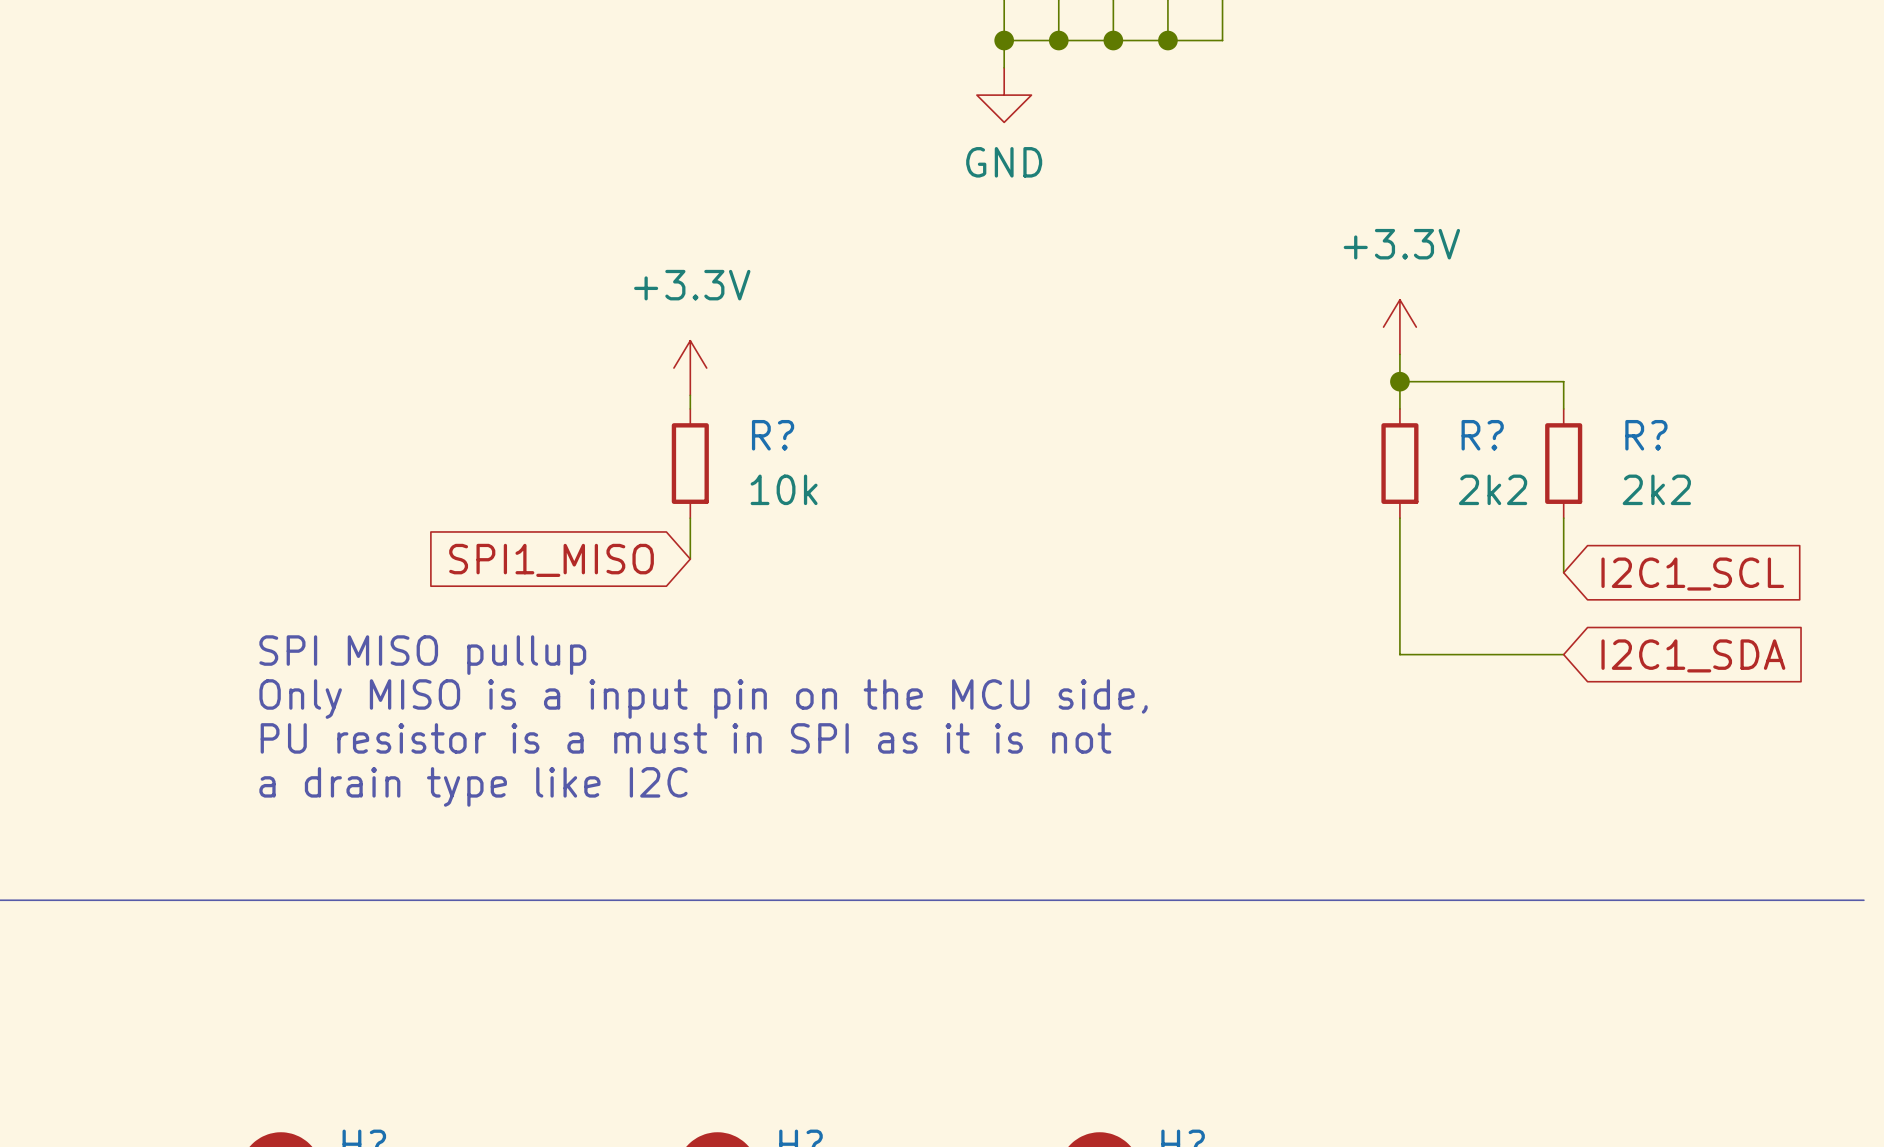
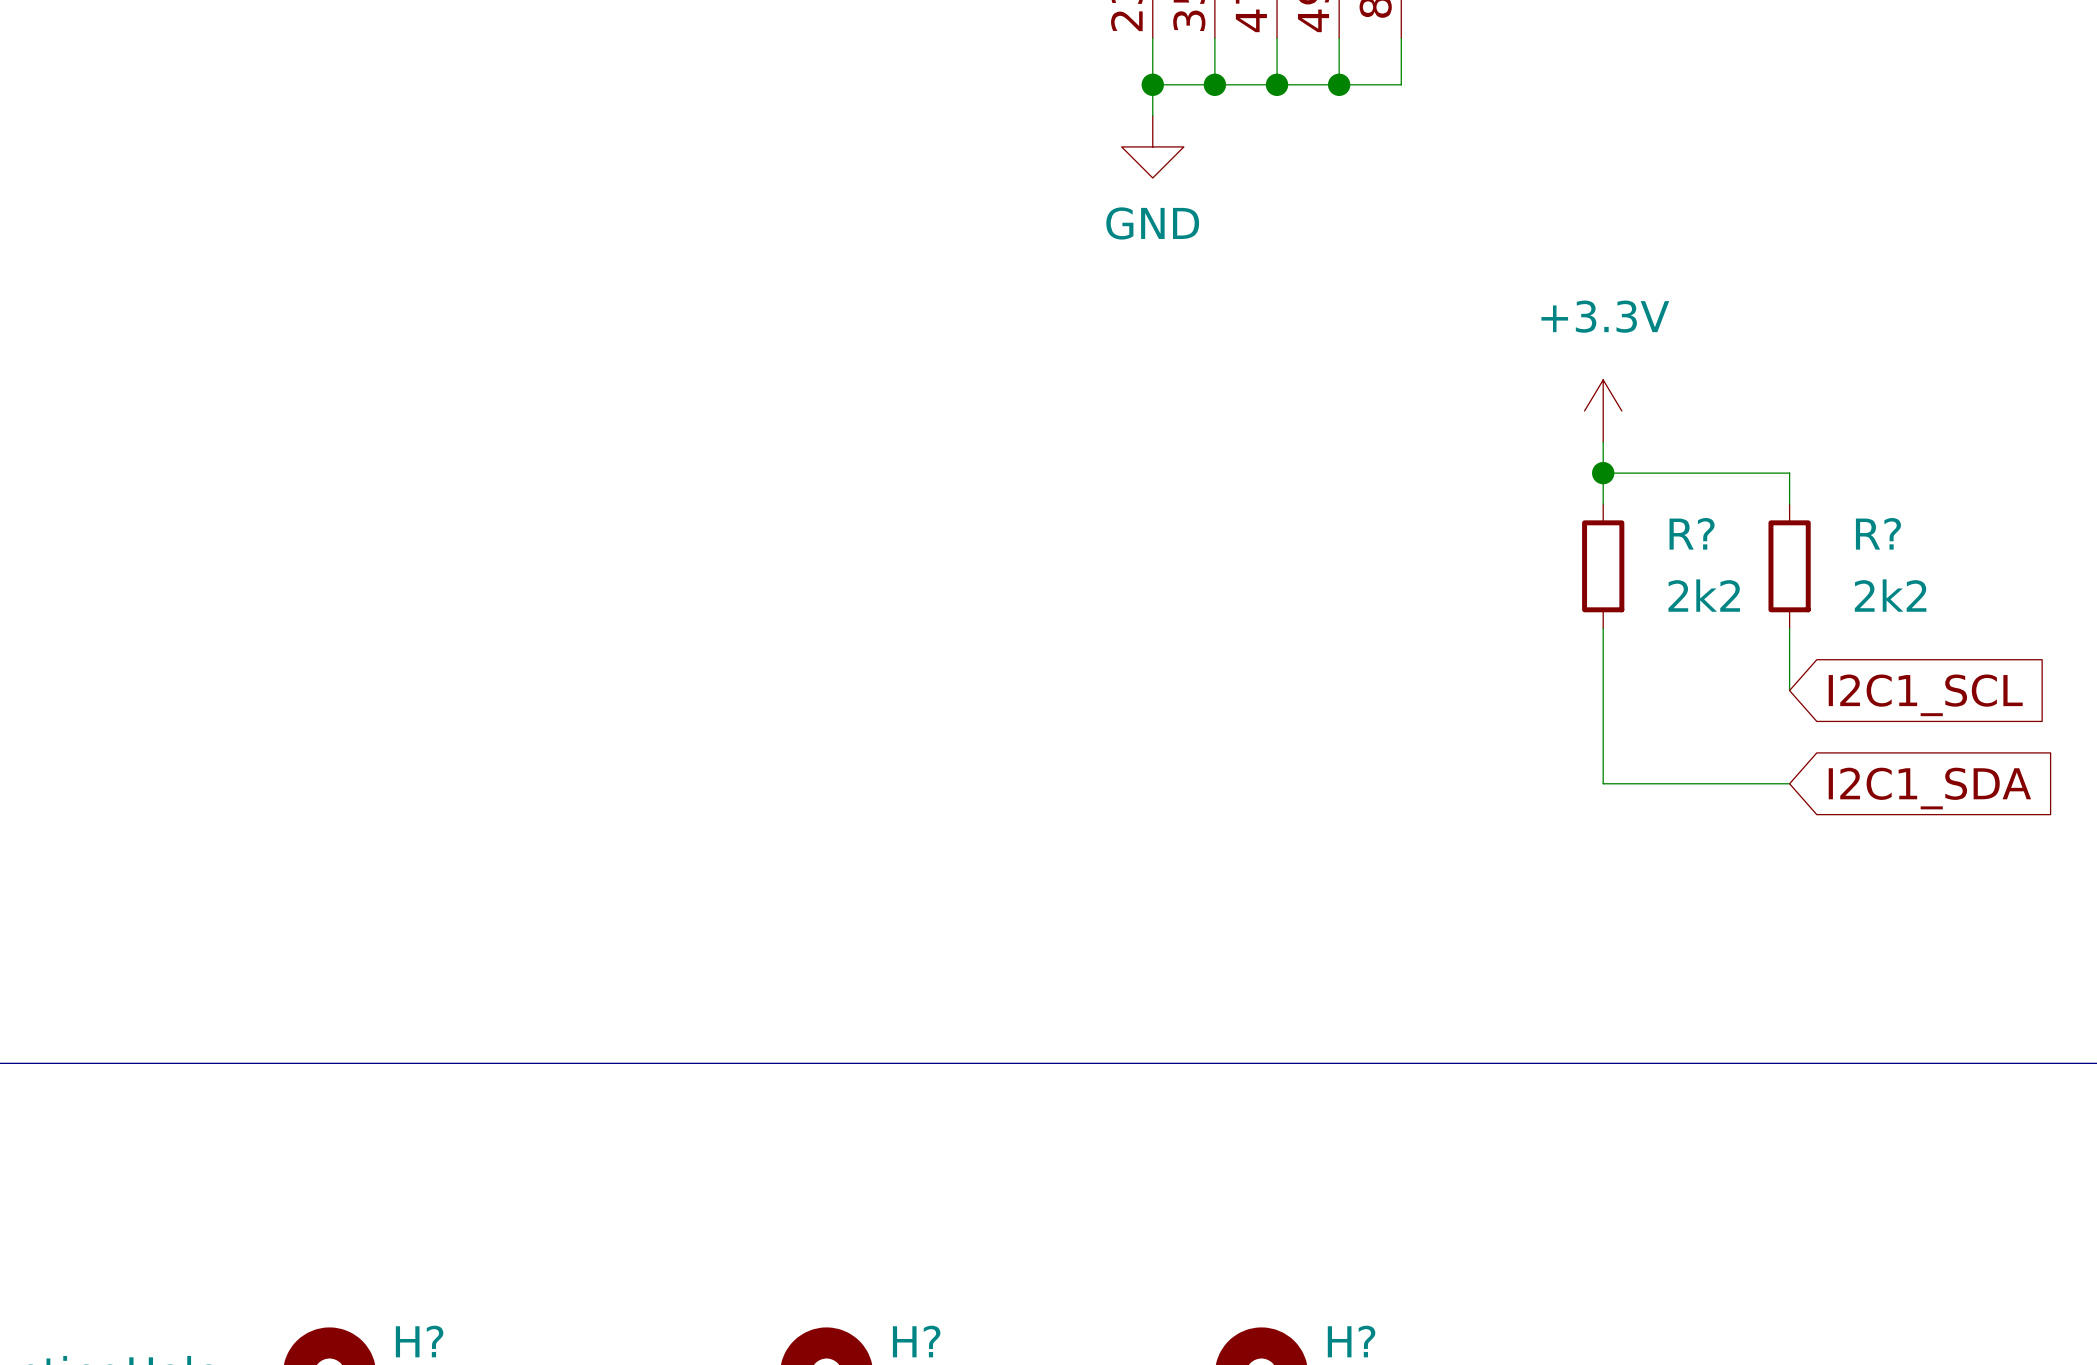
power symbol: +3.3V (690, 368) -> none
wire: (690, 395) (690, 408) -> none
R?: 10k (690, 463) -> none
wire: (690, 518) (690, 559) -> none
global label: SPI1_MISO (551, 560) -> none
text: SPI MISO pullup (422, 655) -> none
text: Only MISO is a input pin on the MCU side, (703, 699) -> none
text: PU resistor is a must in SPI as it is not (685, 738) -> none
text: a drain type like I2C (473, 786) -> none

